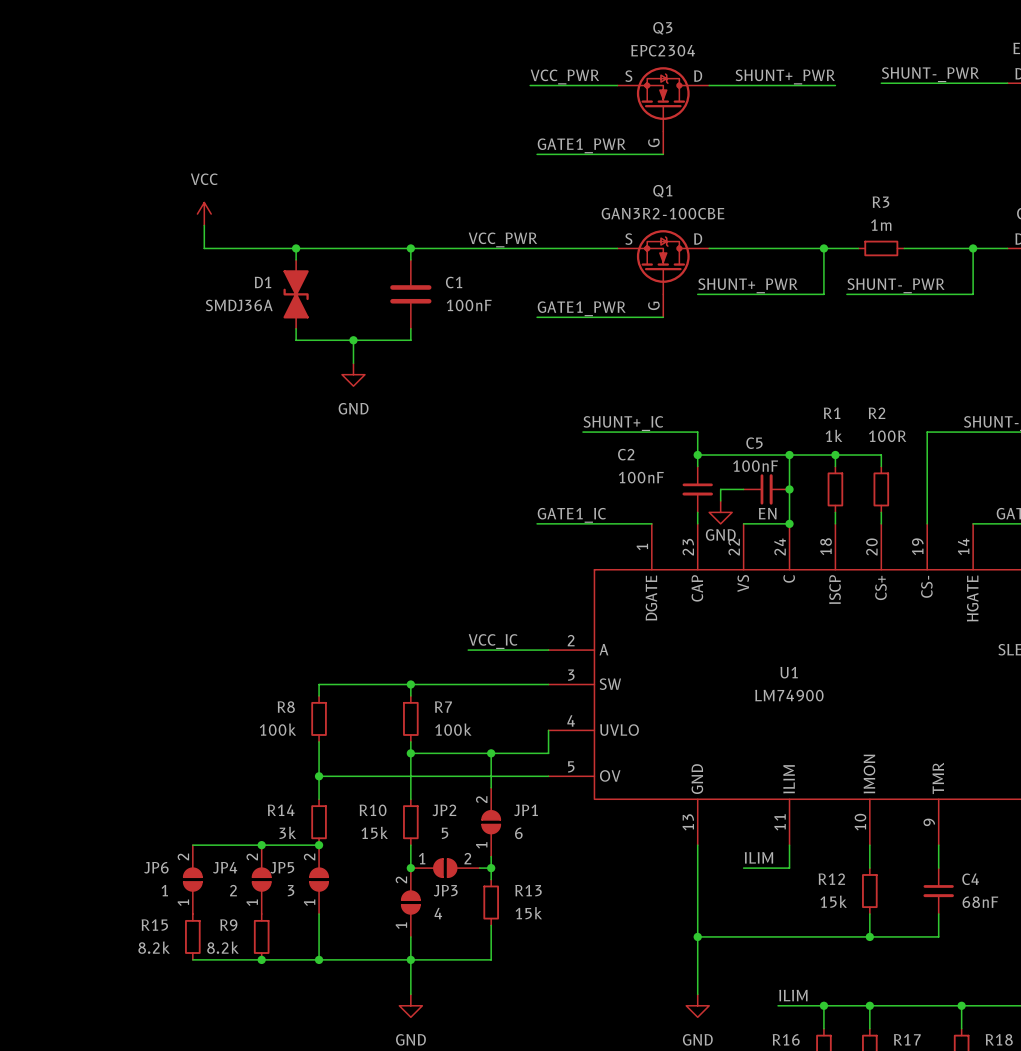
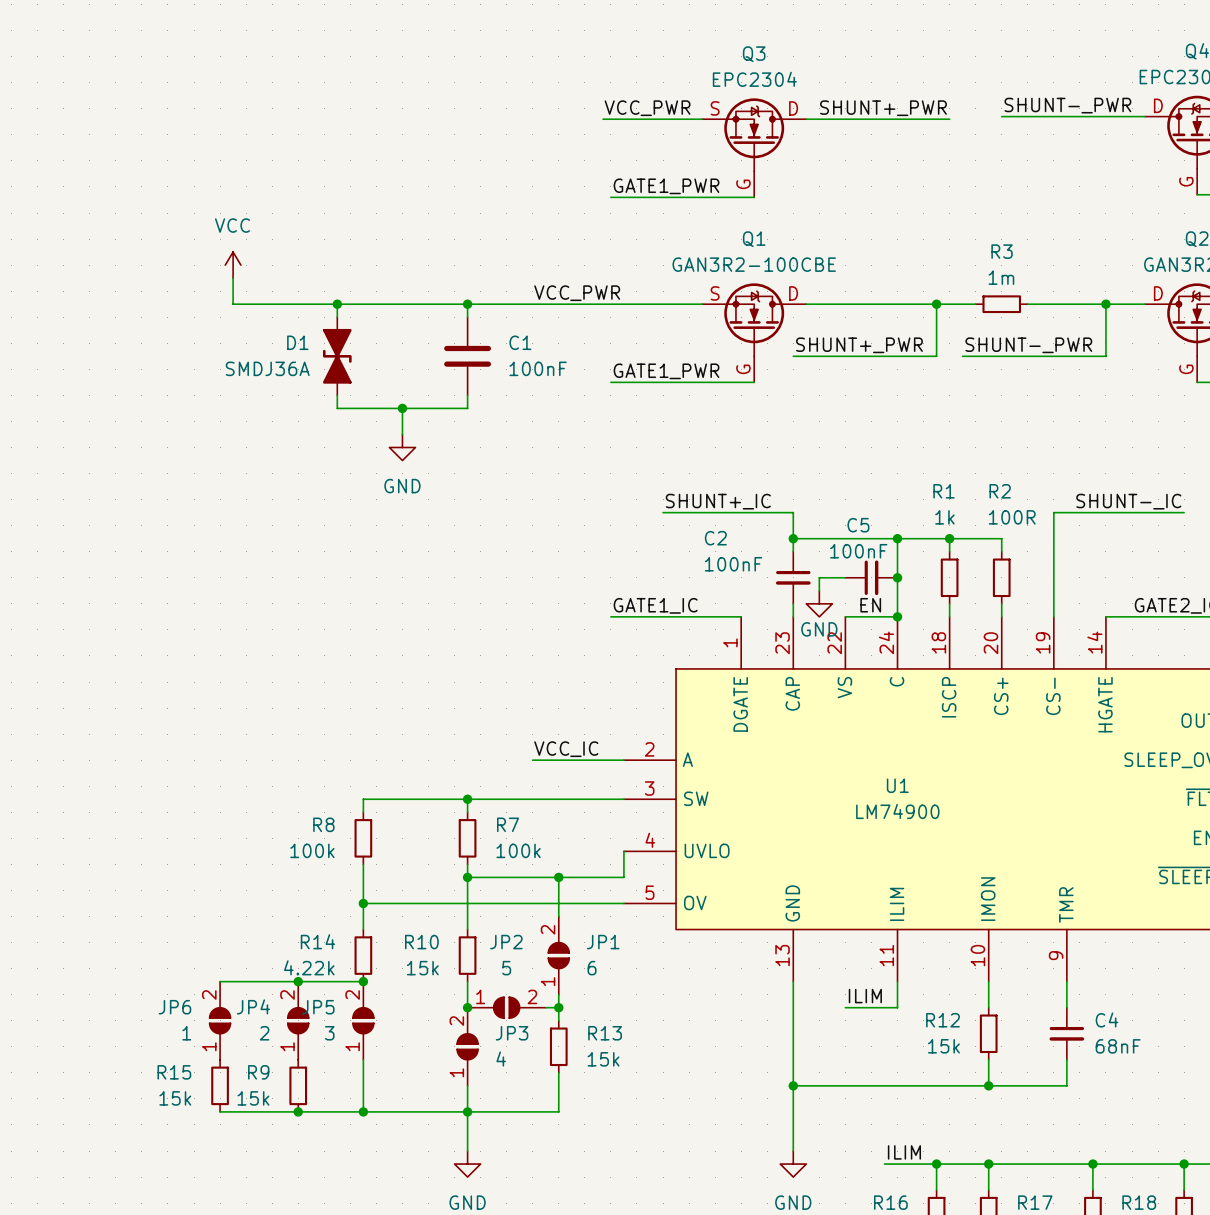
R14 value: 3k (287, 832) -> 4.22k (309, 967)
R15 value: 8.2k (154, 947) -> 15k (175, 1098)
R9 value: 8.2k (222, 947) -> 15k (253, 1098)

